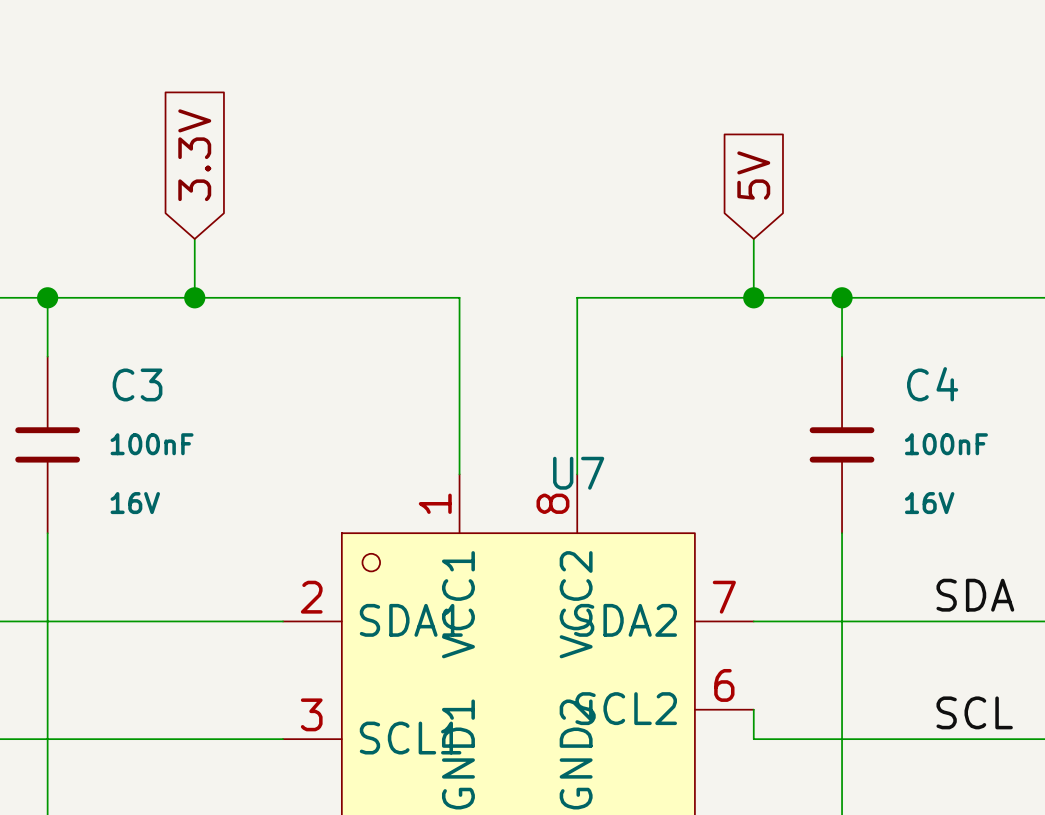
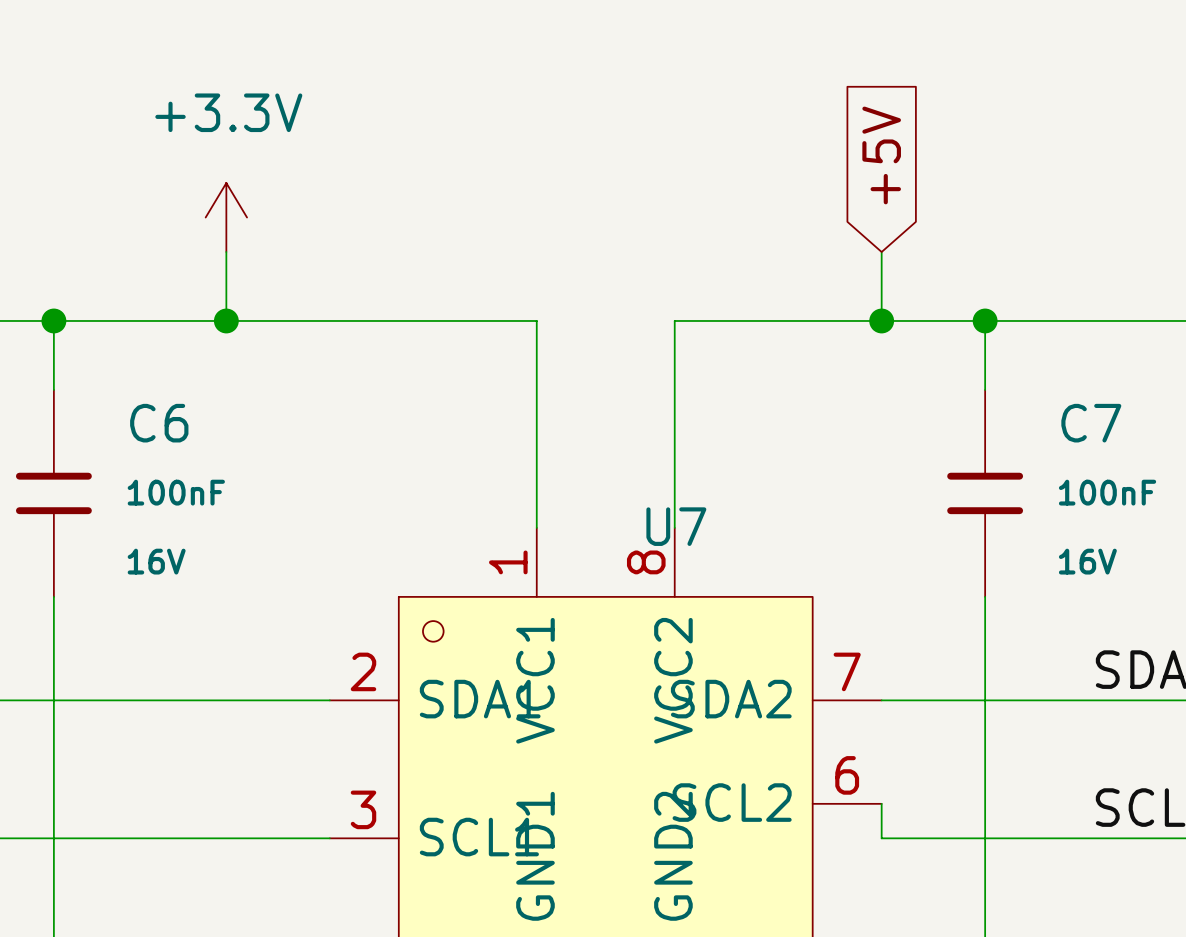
global label: 3.3V (194, 155) -> none
global label: 5V (753, 175) -> +5V (881, 155)
power symbol: none -> +3.3V (226, 217)
C3 name: C3 (137, 384) -> C6 (159, 423)
C4 name: C4 (932, 384) -> C7 (1091, 423)

